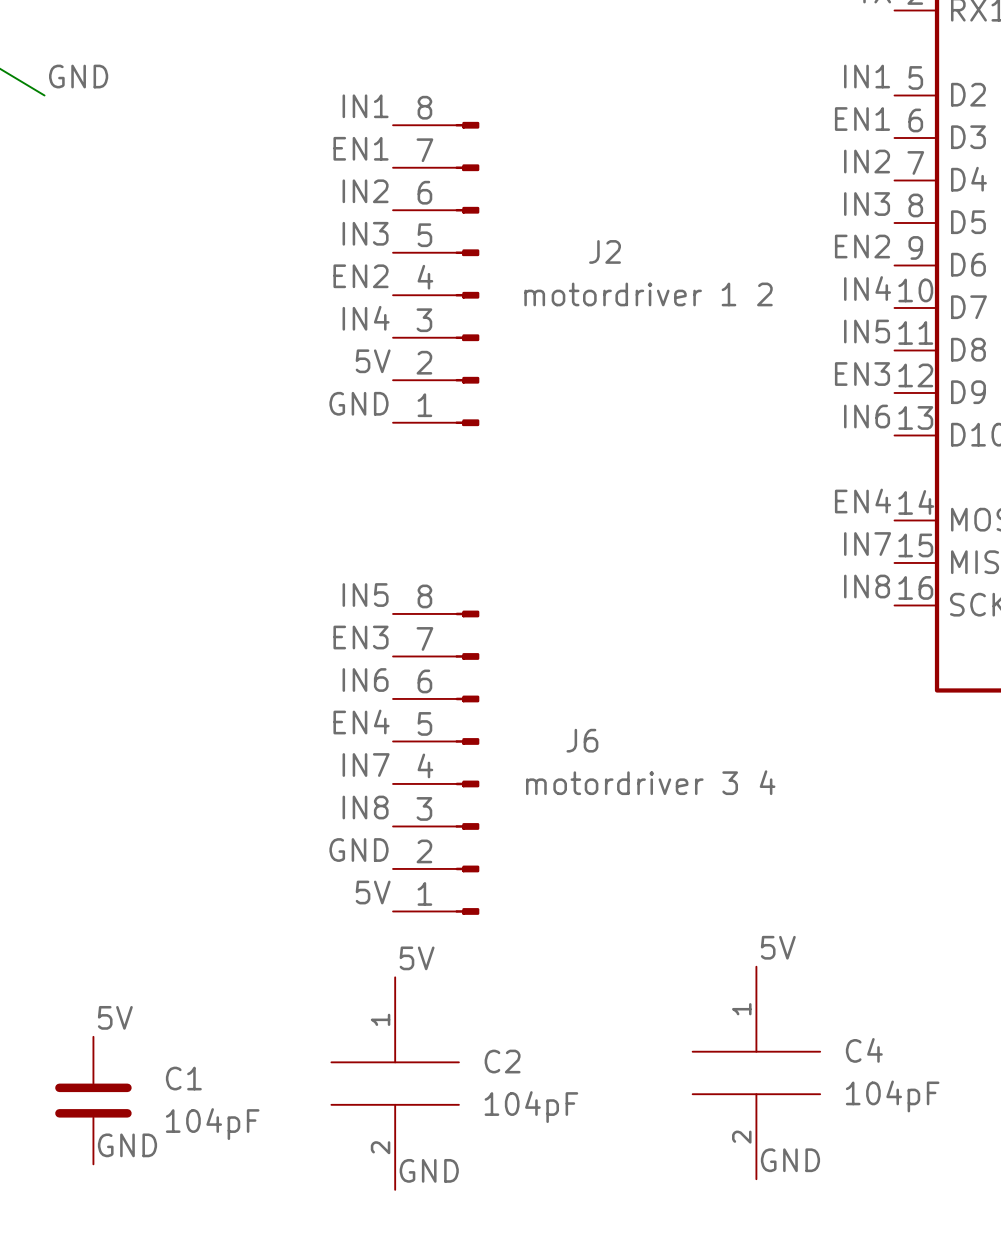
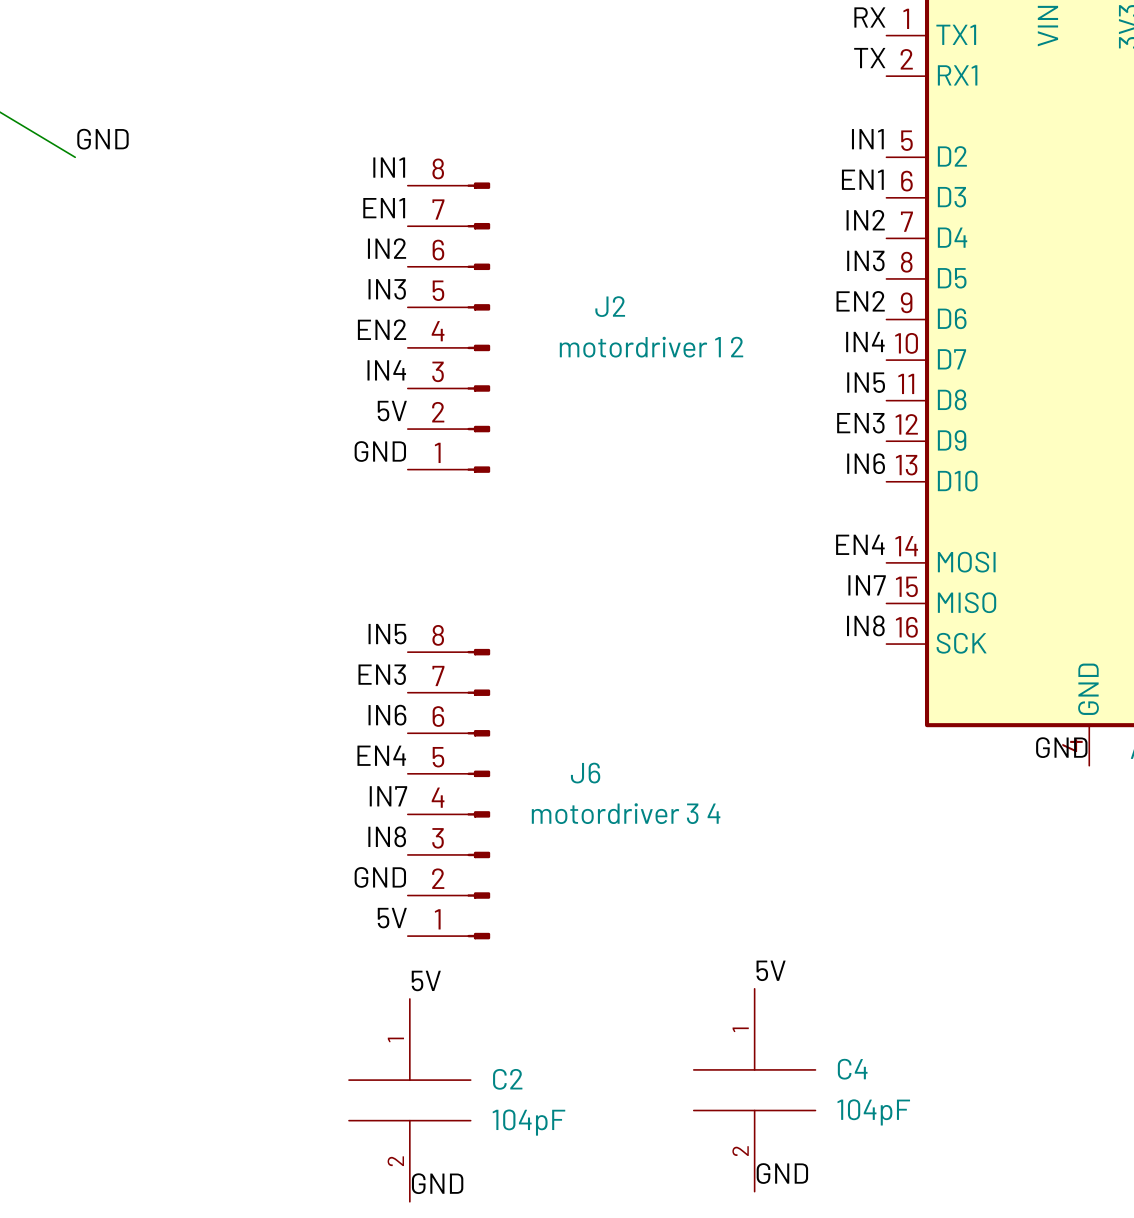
label: 5V (115, 1017) -> none
C1: 104pF (93, 1100) -> none
label: GND (127, 1145) -> none

